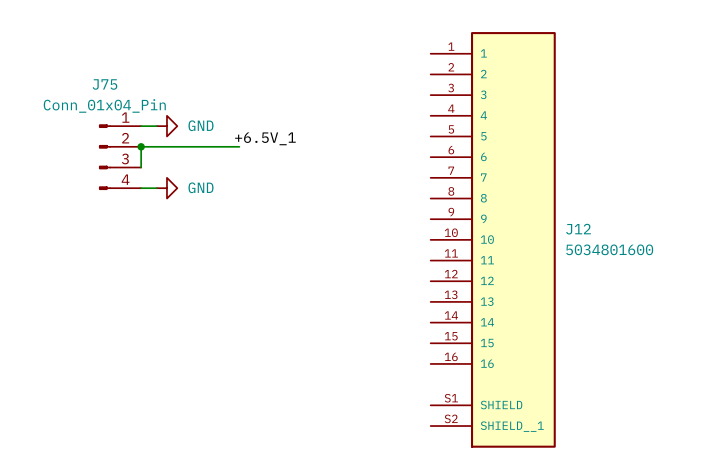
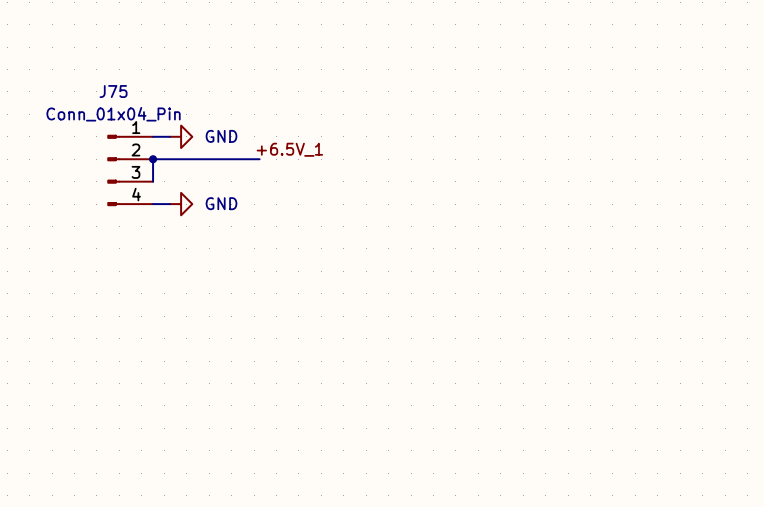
J12: 5034801600 (493, 239) -> none

